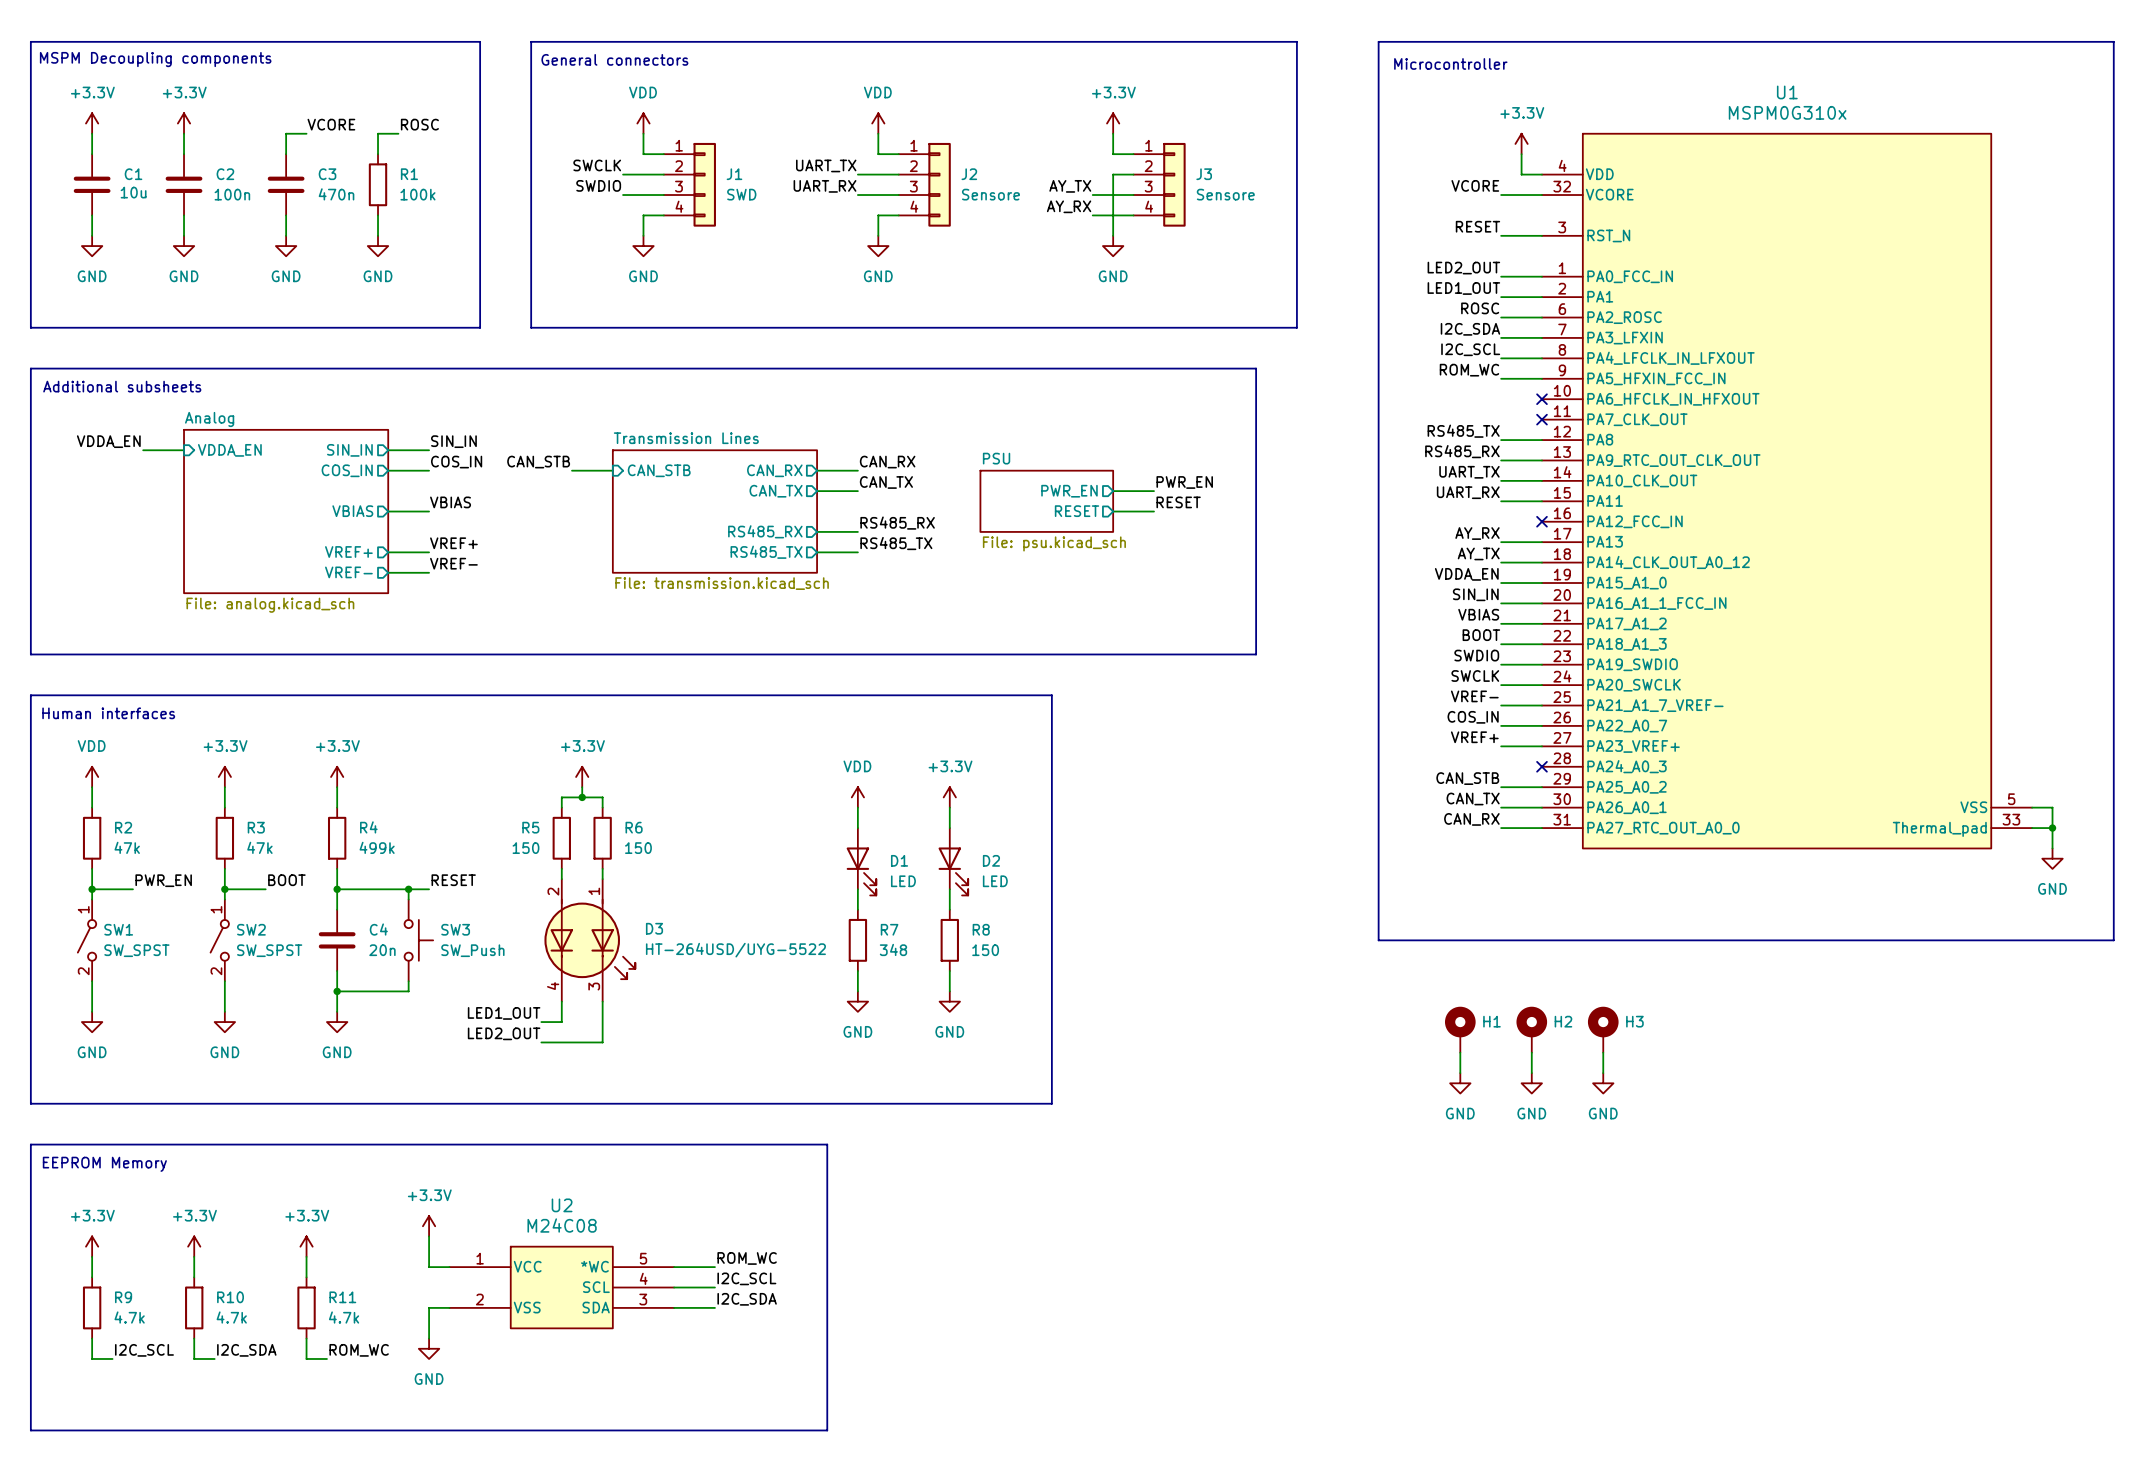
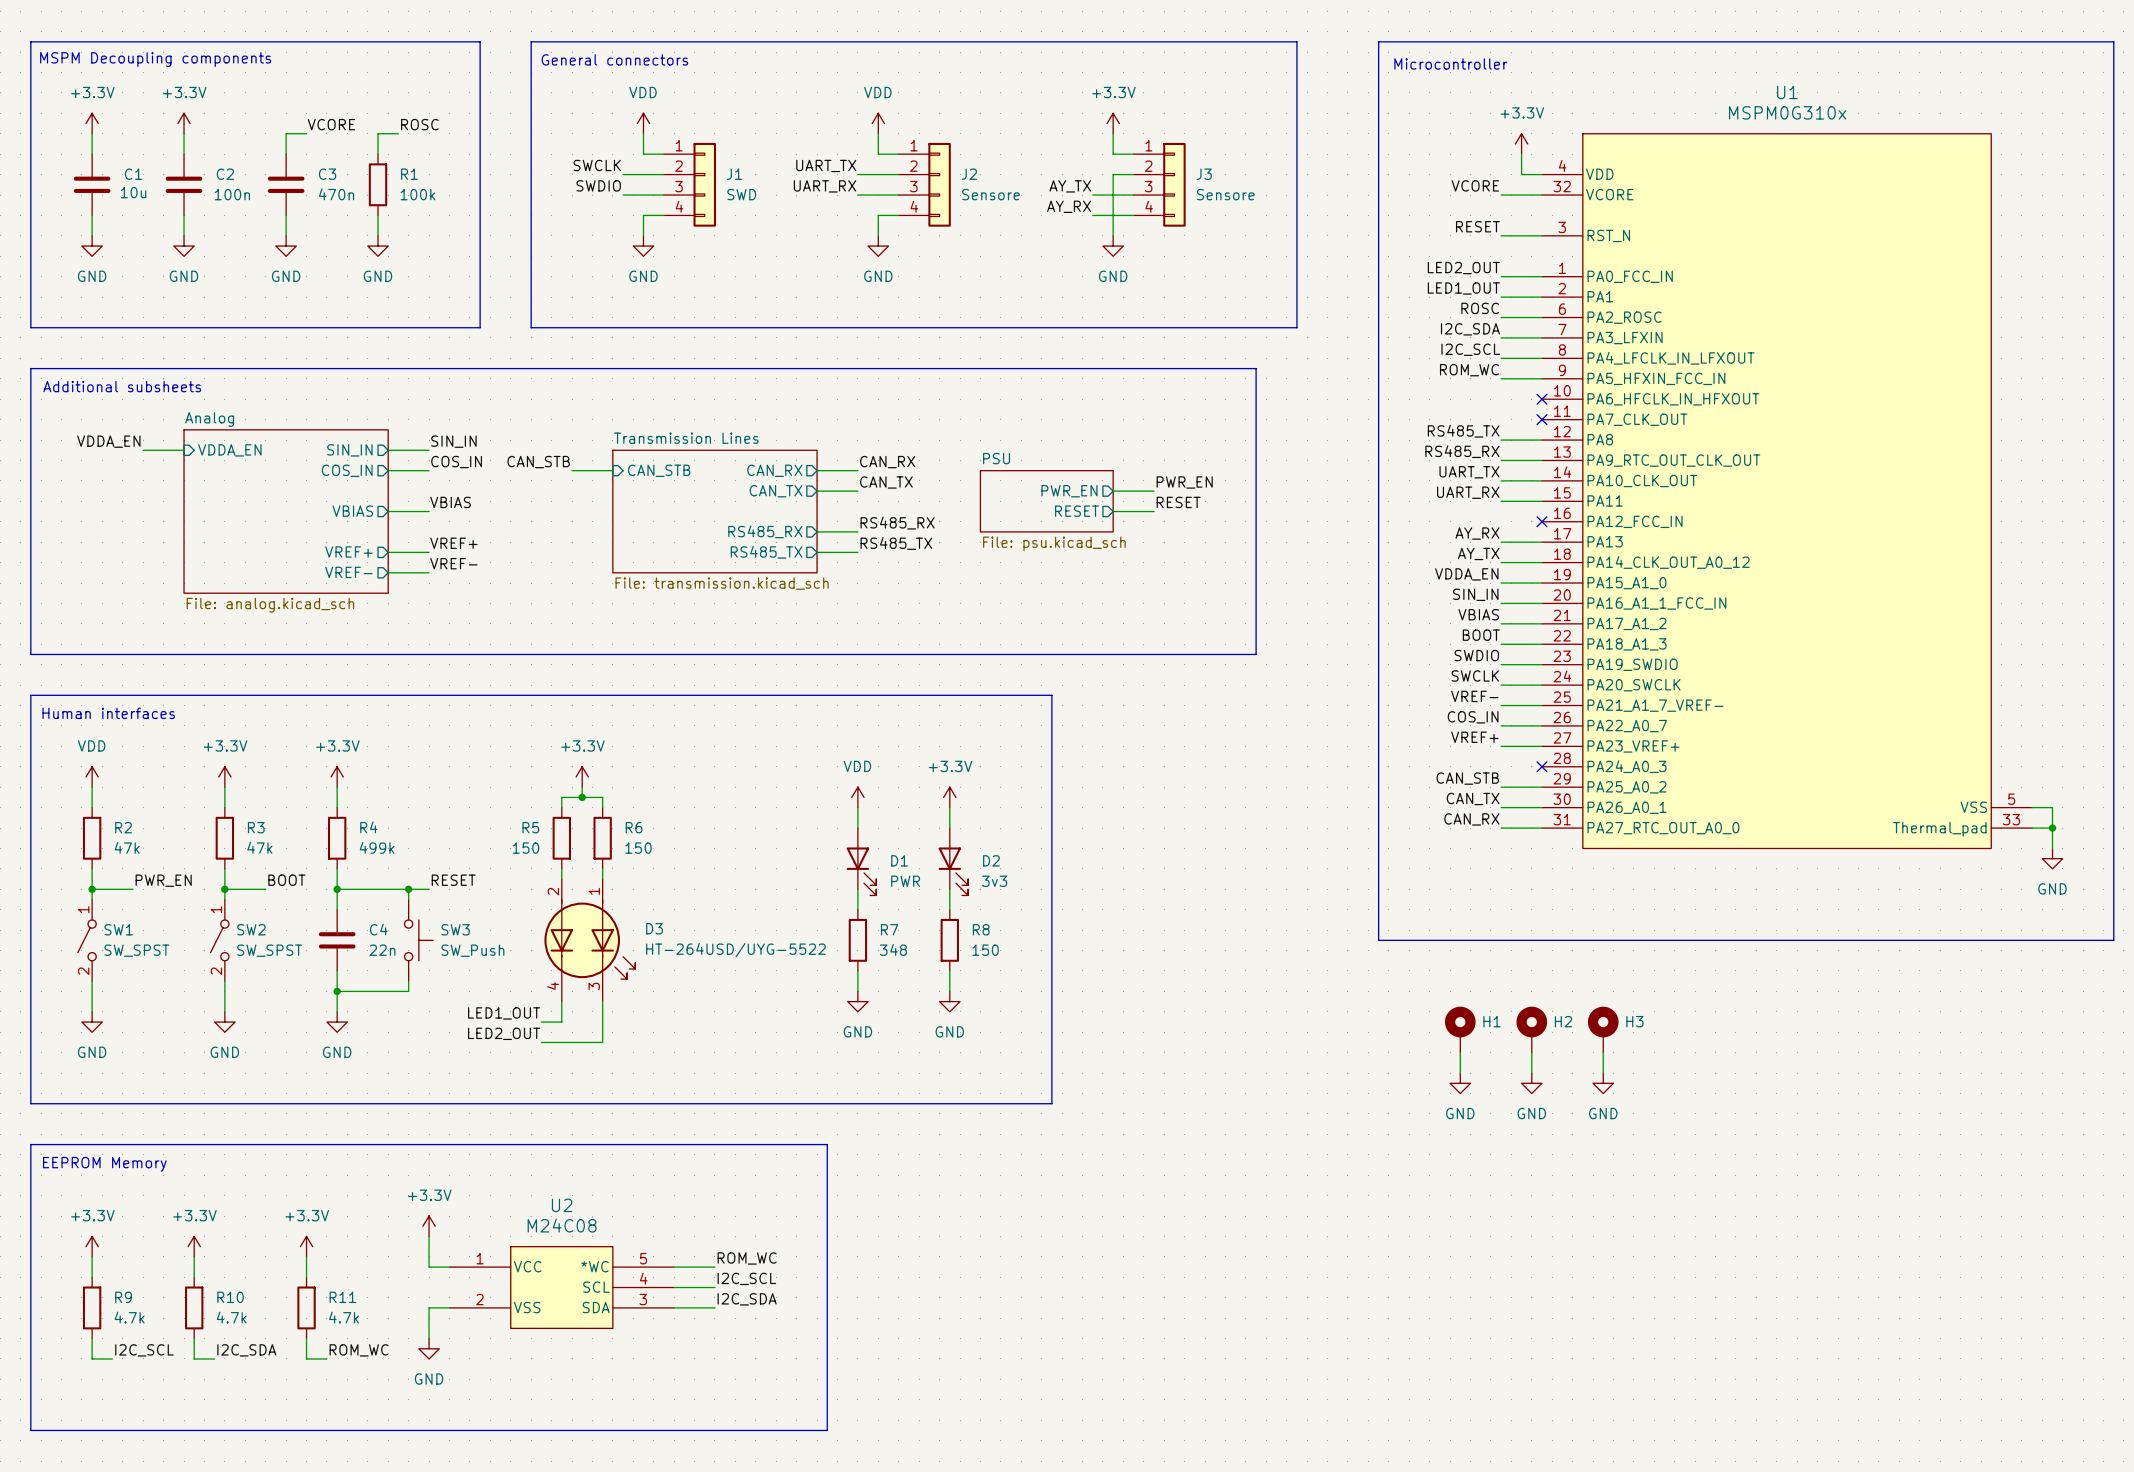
D1 value: LED (903, 881) -> PWR (905, 881)
D2 value: LED (995, 881) -> 3v3 (994, 881)
C4 value: 20n (382, 950) -> 22n (382, 950)

